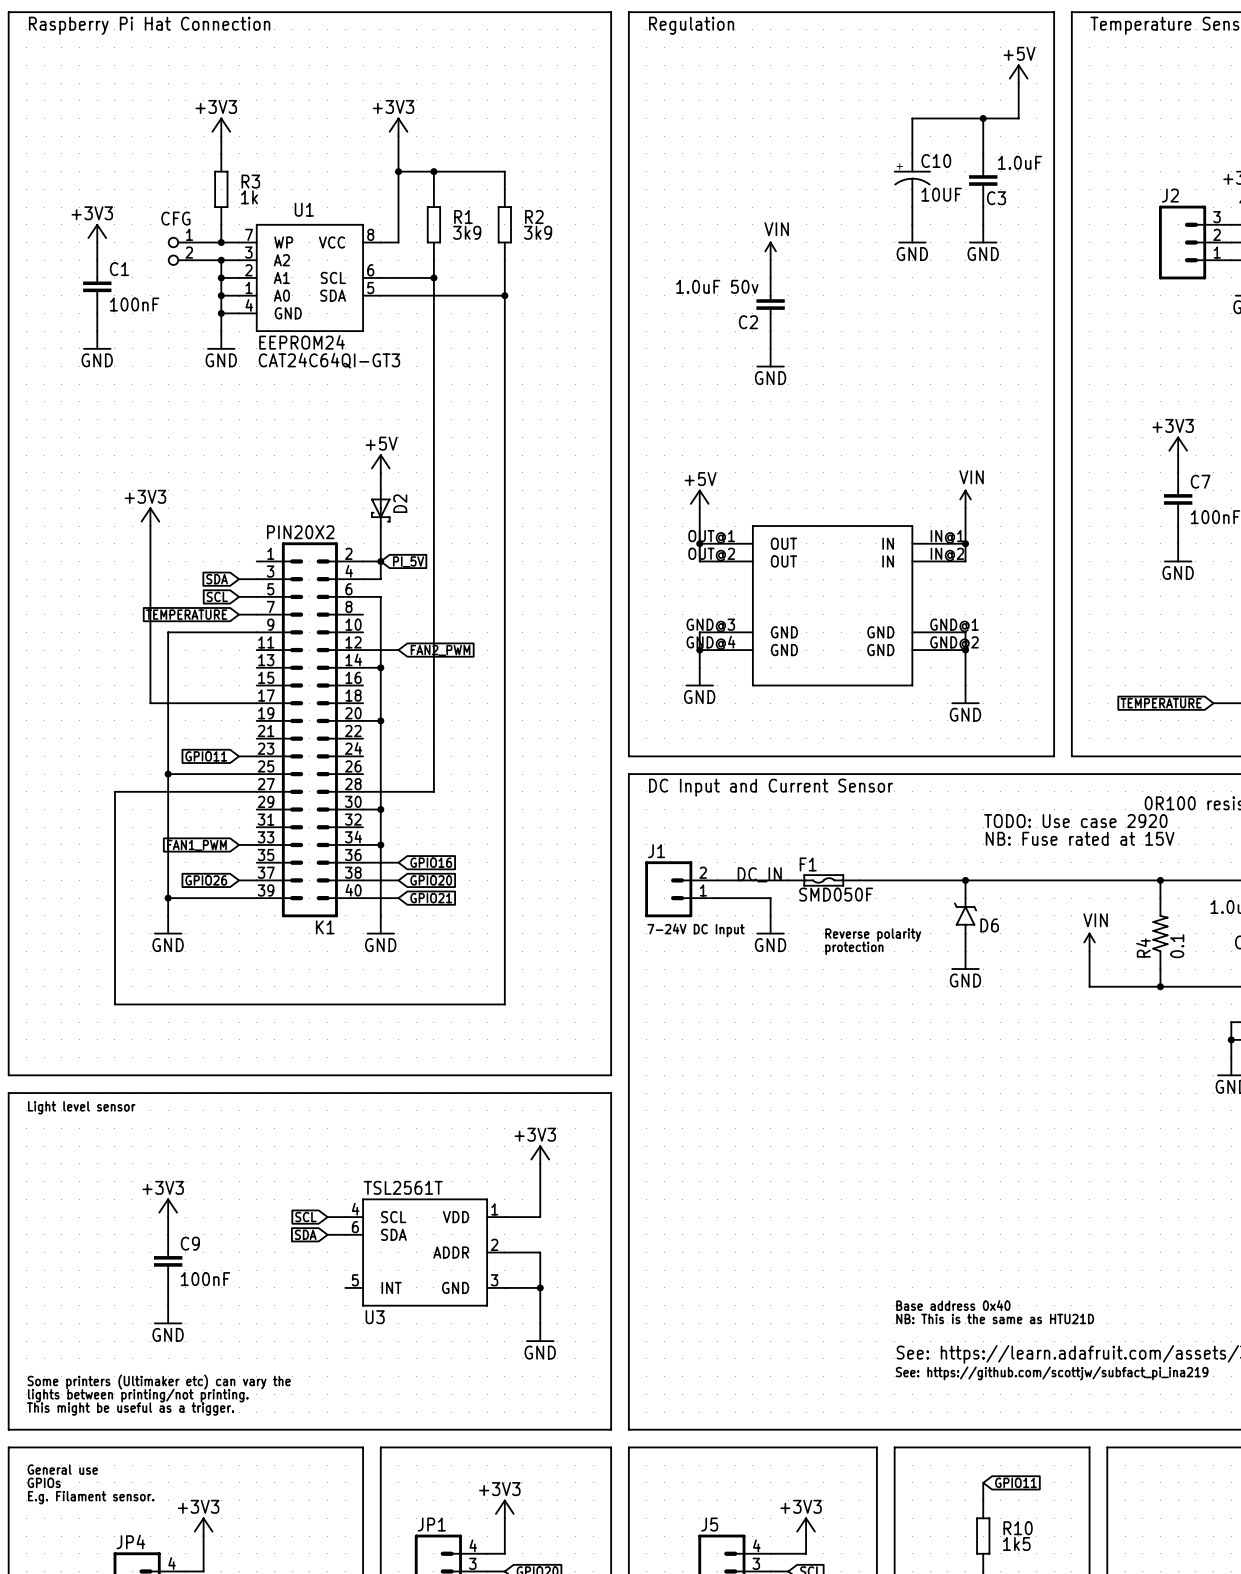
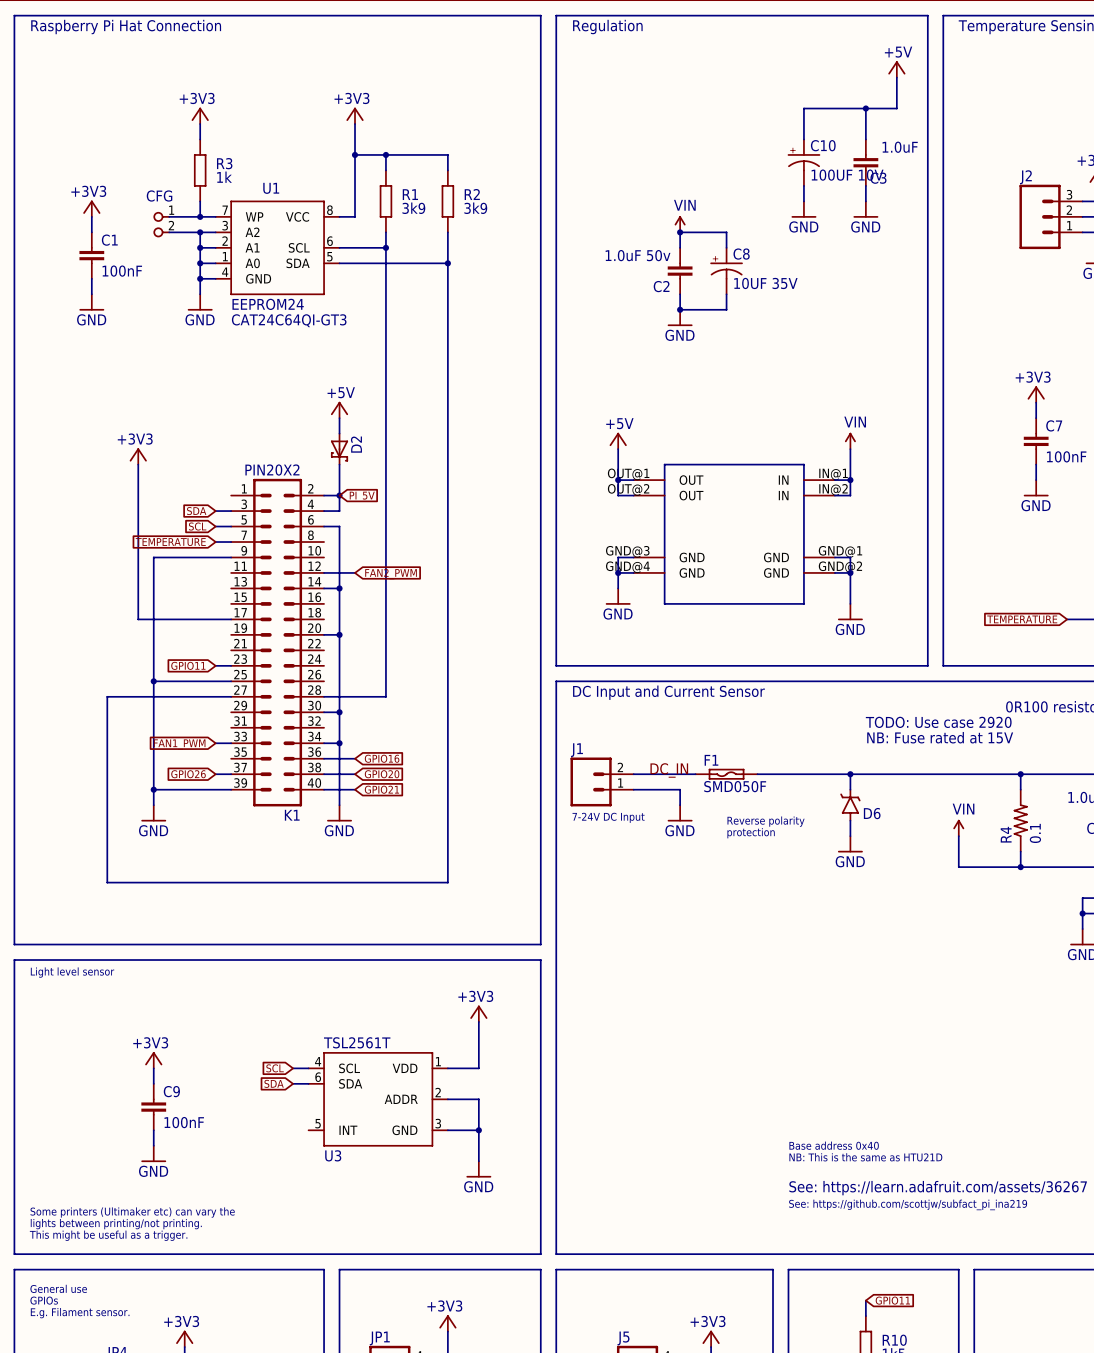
C10 value: 10UF (941, 194) -> 100UF 10V (847, 175)
wire: none -> (680, 232) (726, 232) (726, 247)
junction: none -> (680, 232)
C8: none -> 10UF 35V (726, 271)
wire: none -> (726, 294) (726, 309) (680, 309)
junction: none -> (680, 309)

